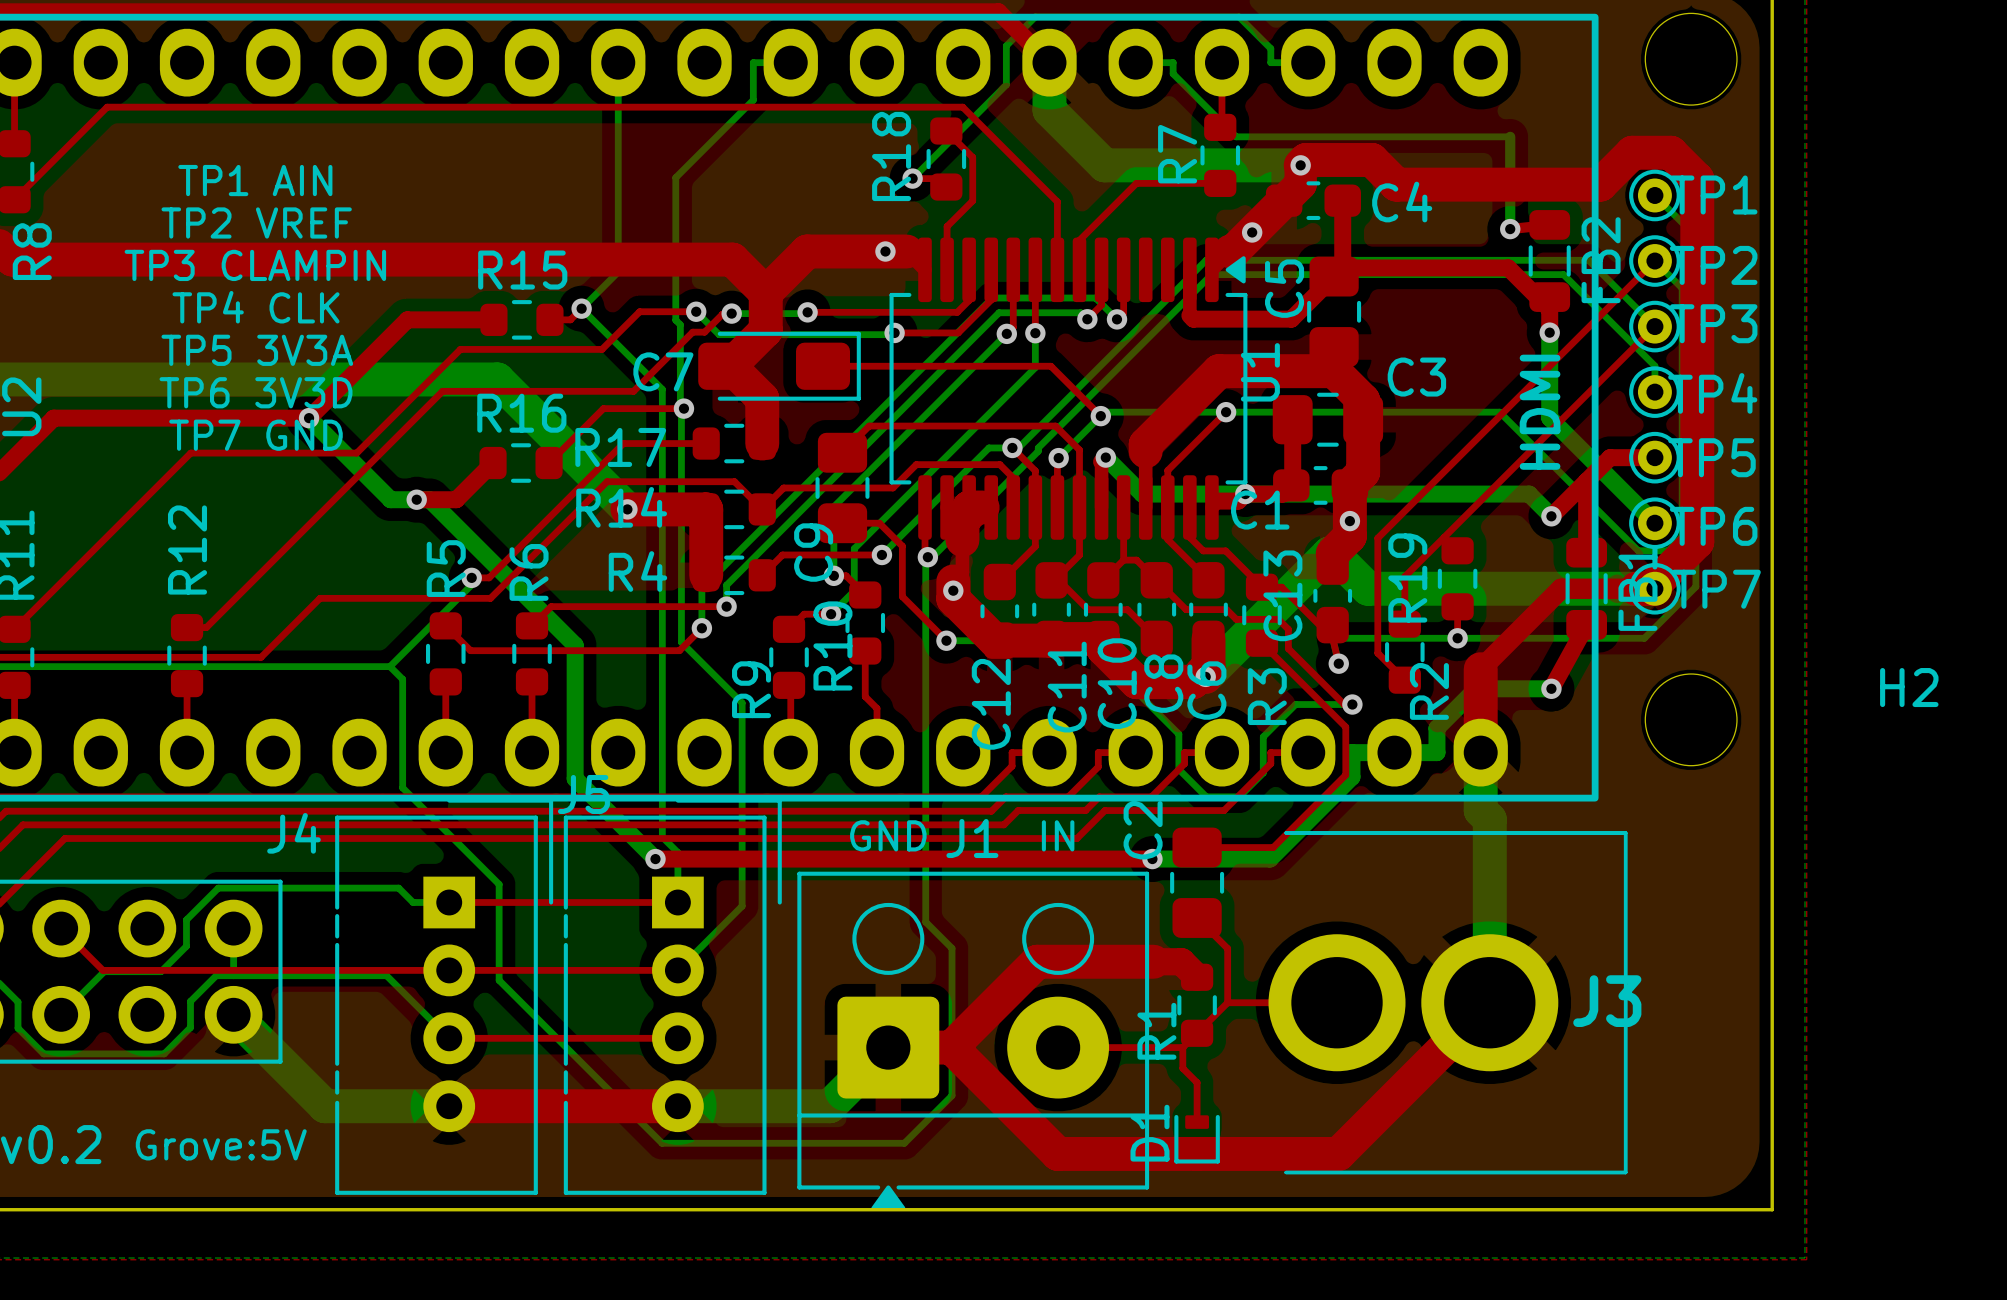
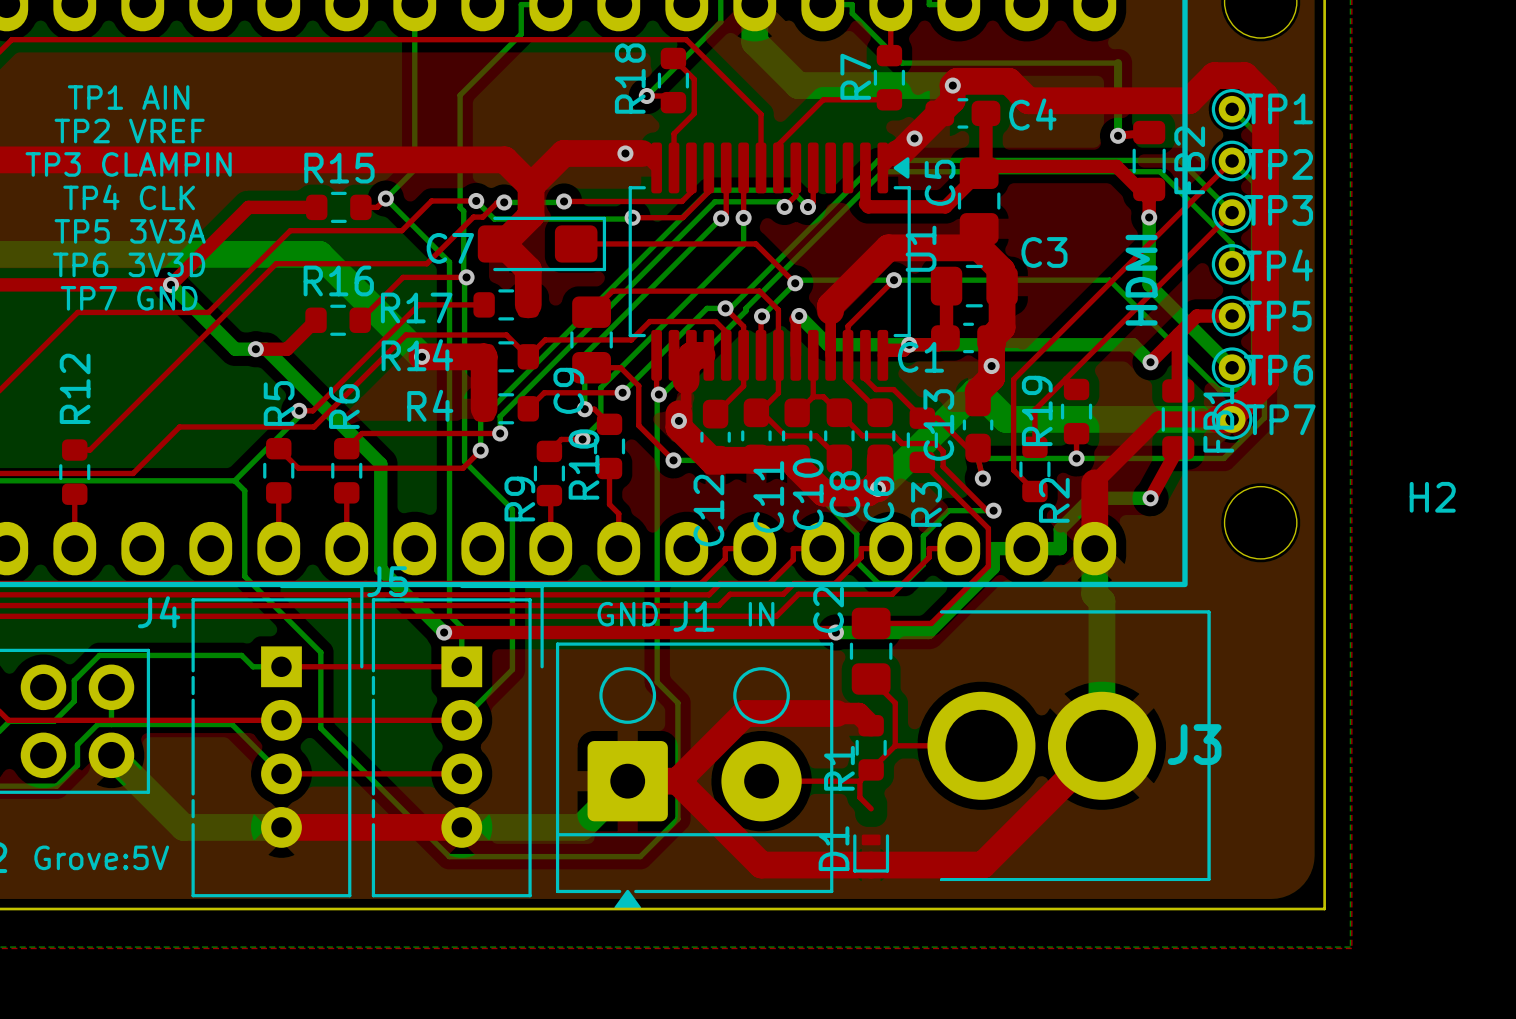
top track: (1197, 1082) (1197, 1122) -> none

